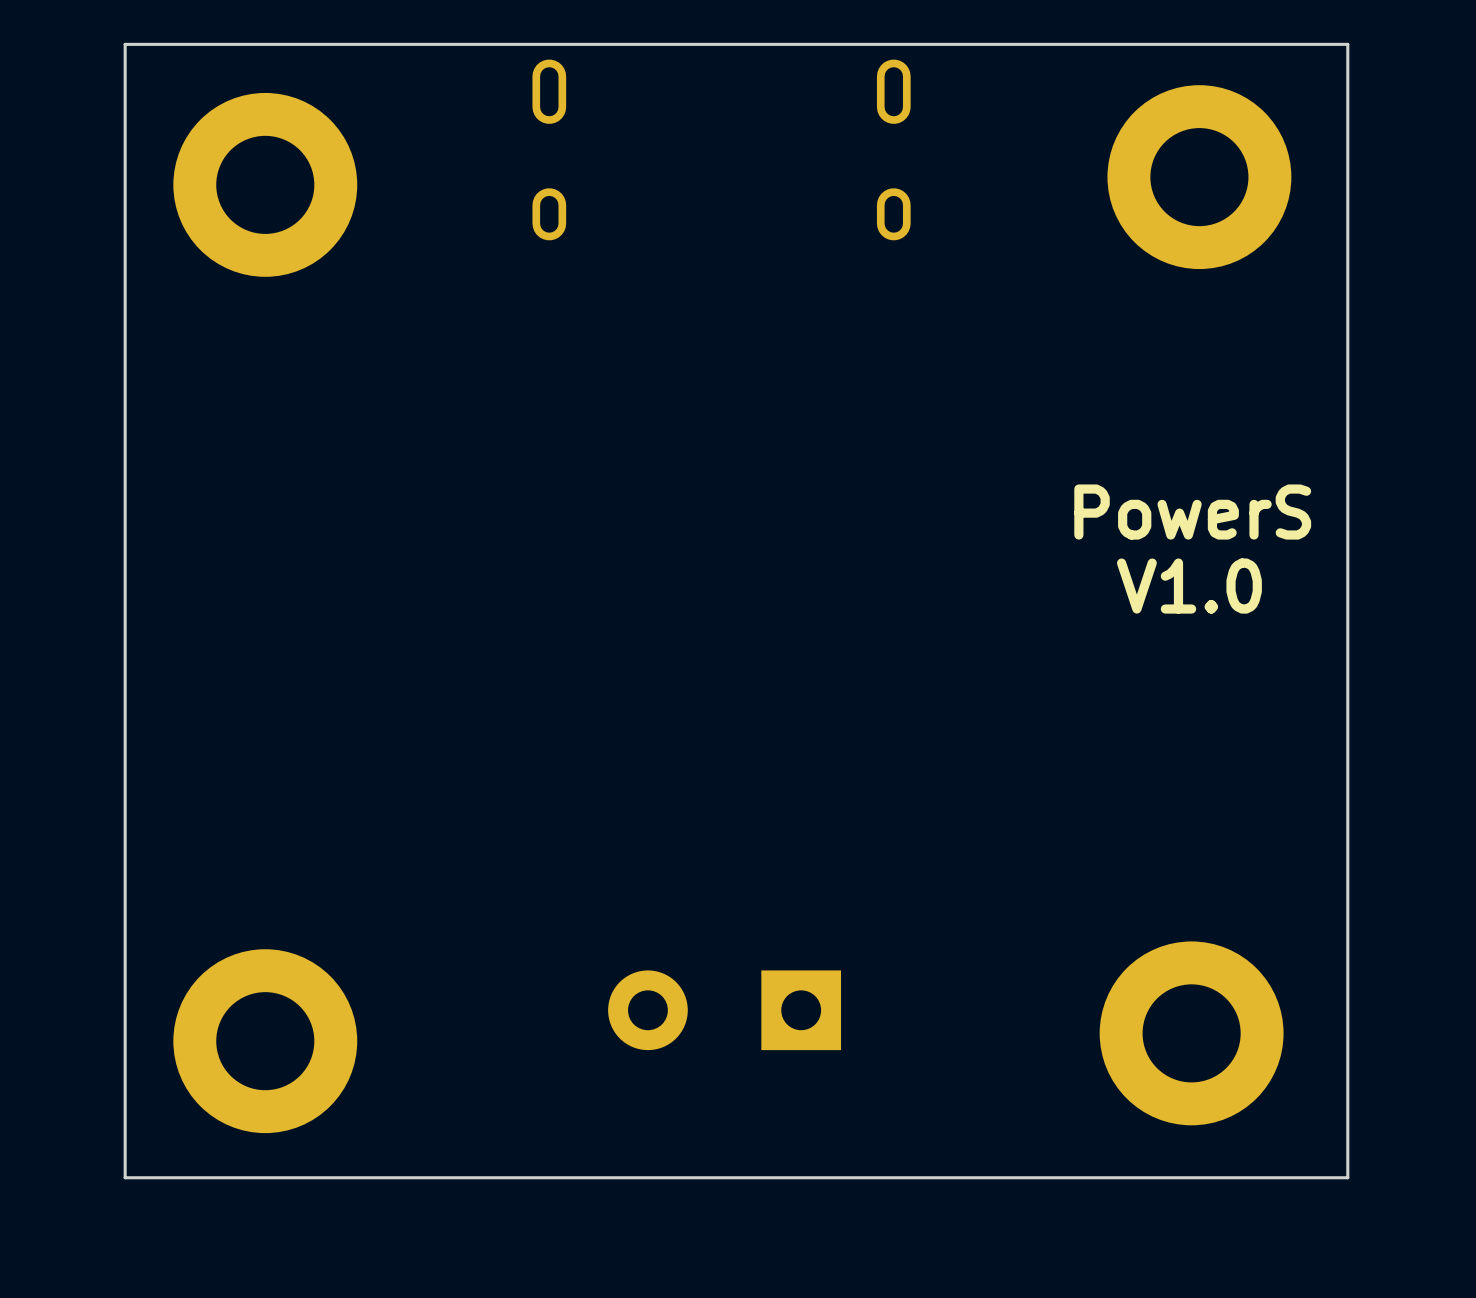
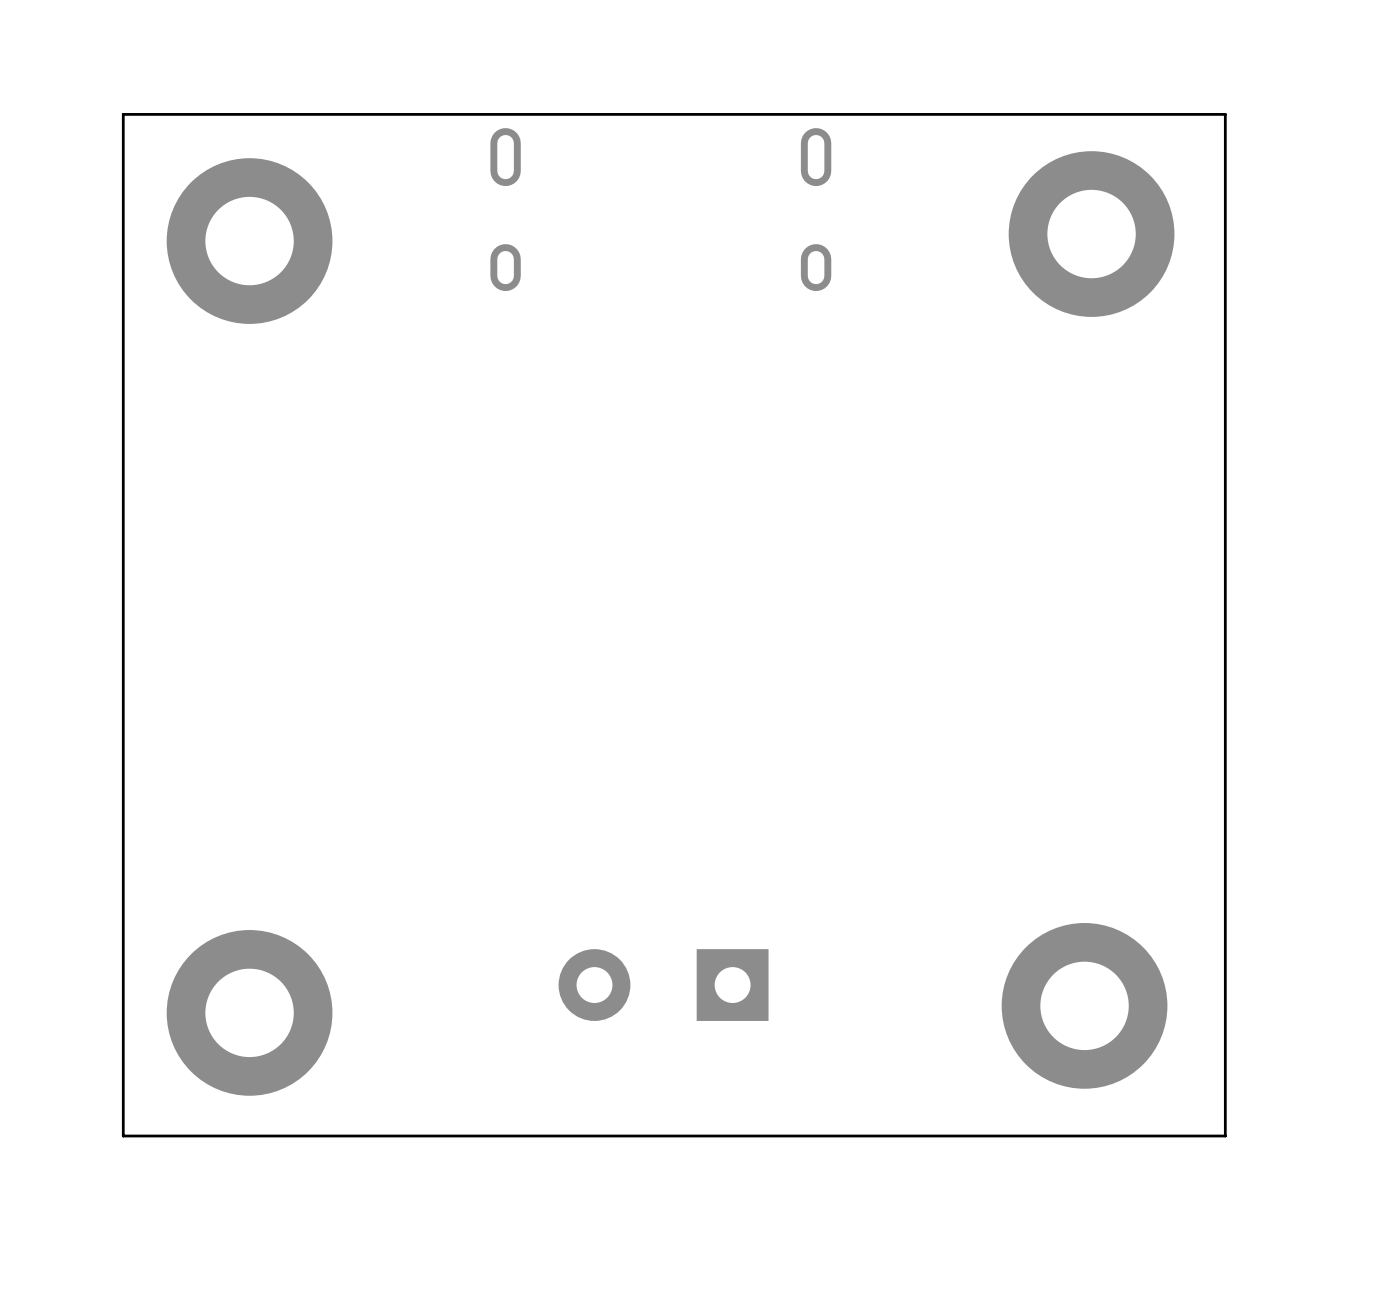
text: PowerS (1192, 512) -> none
text: V1.0 (1189, 586) -> none

